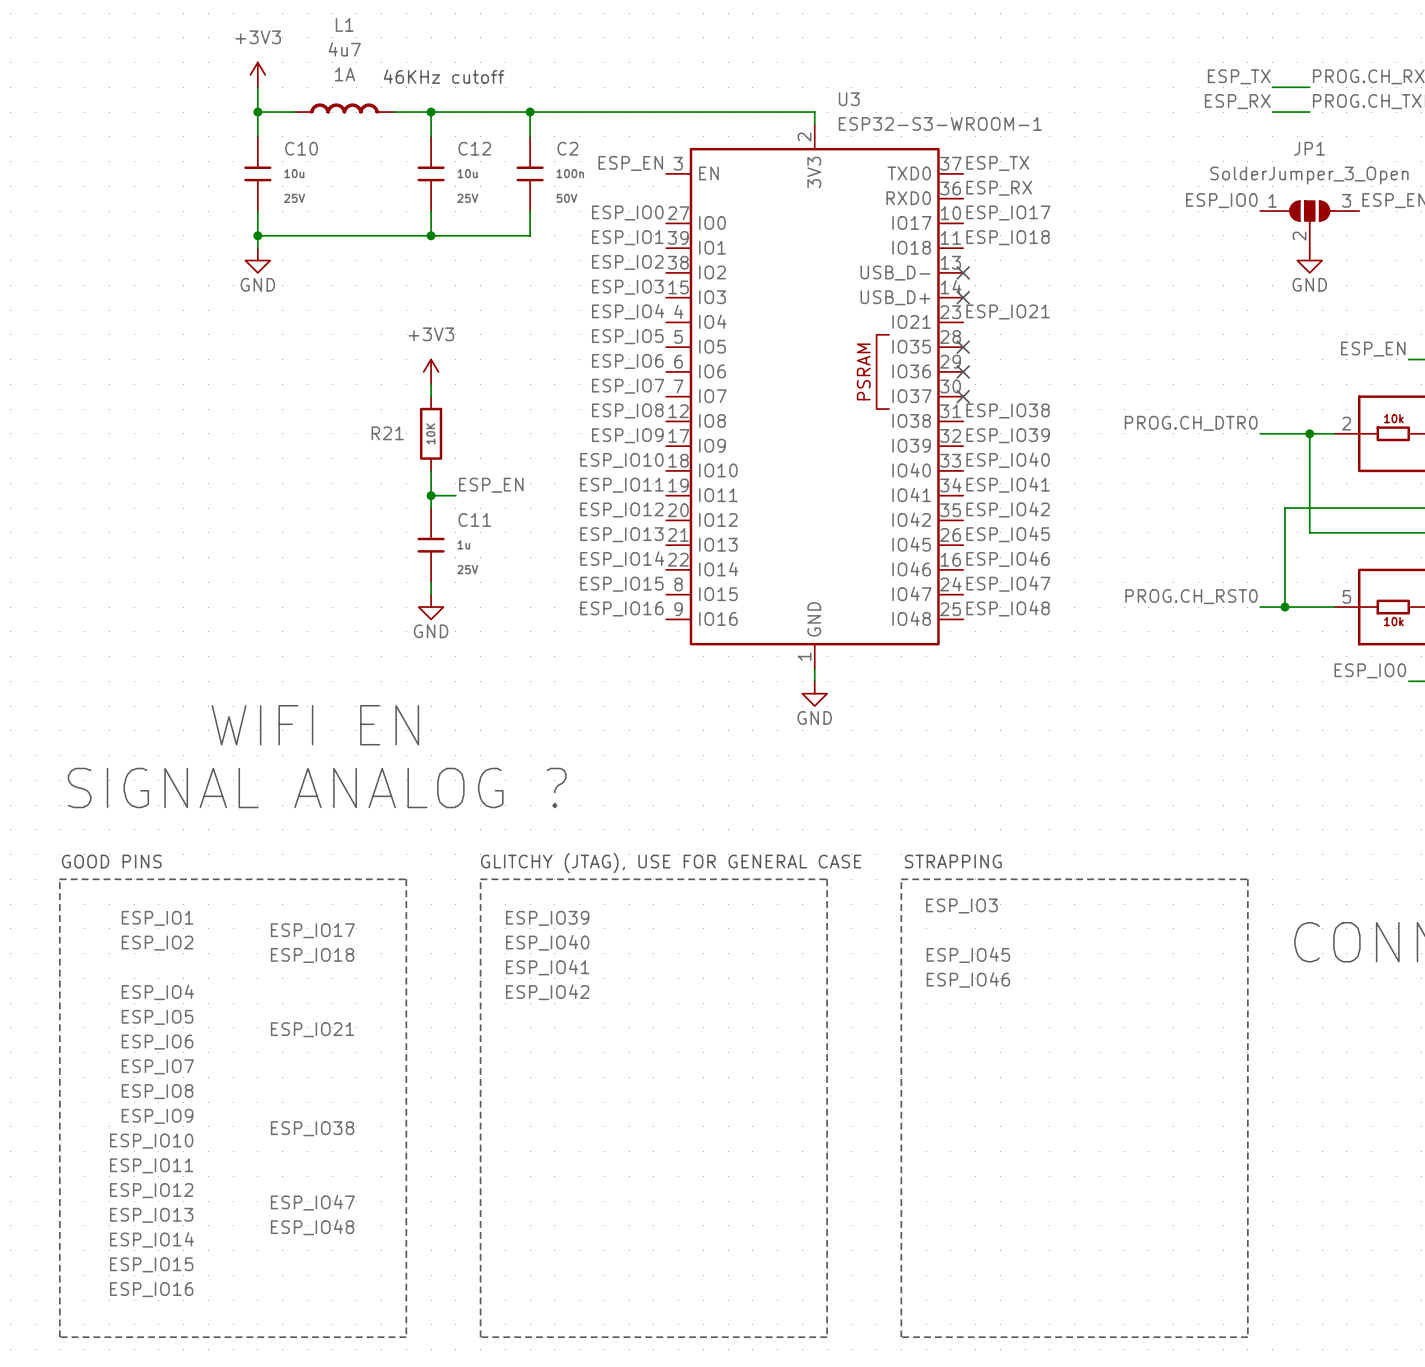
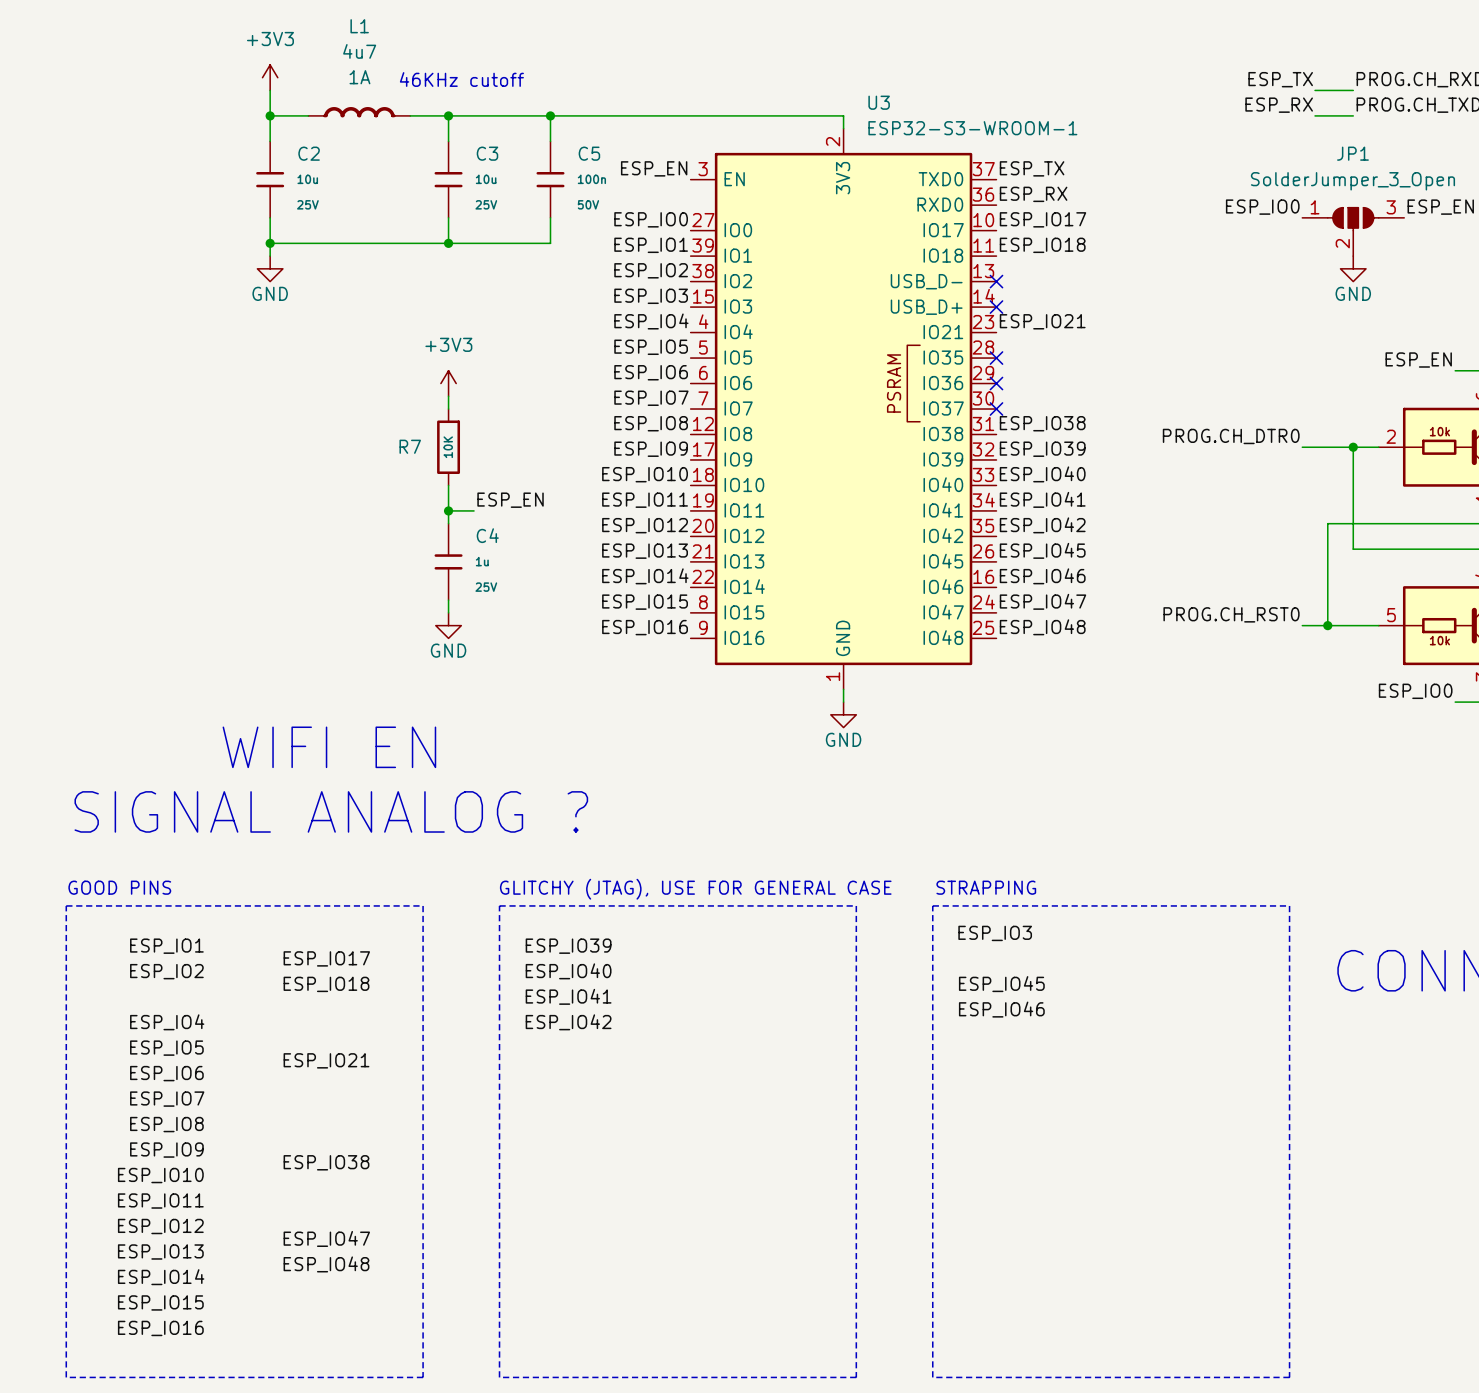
C10 name: C10 (301, 148) -> C2 (309, 153)
C12 name: C12 (474, 148) -> C3 (487, 153)
C2 name: C2 (567, 148) -> C5 (589, 153)
R21 name: R21 (387, 433) -> R7 (410, 446)
C11 name: C11 (474, 519) -> C4 (487, 535)

